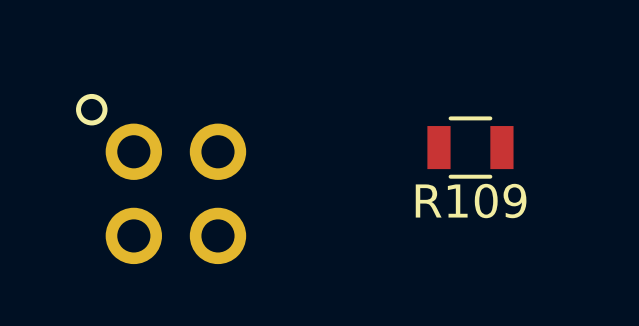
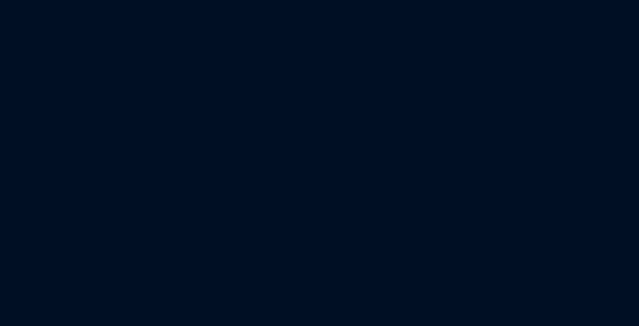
R109: (470, 147) -> none
part: (161, 179) -> none

